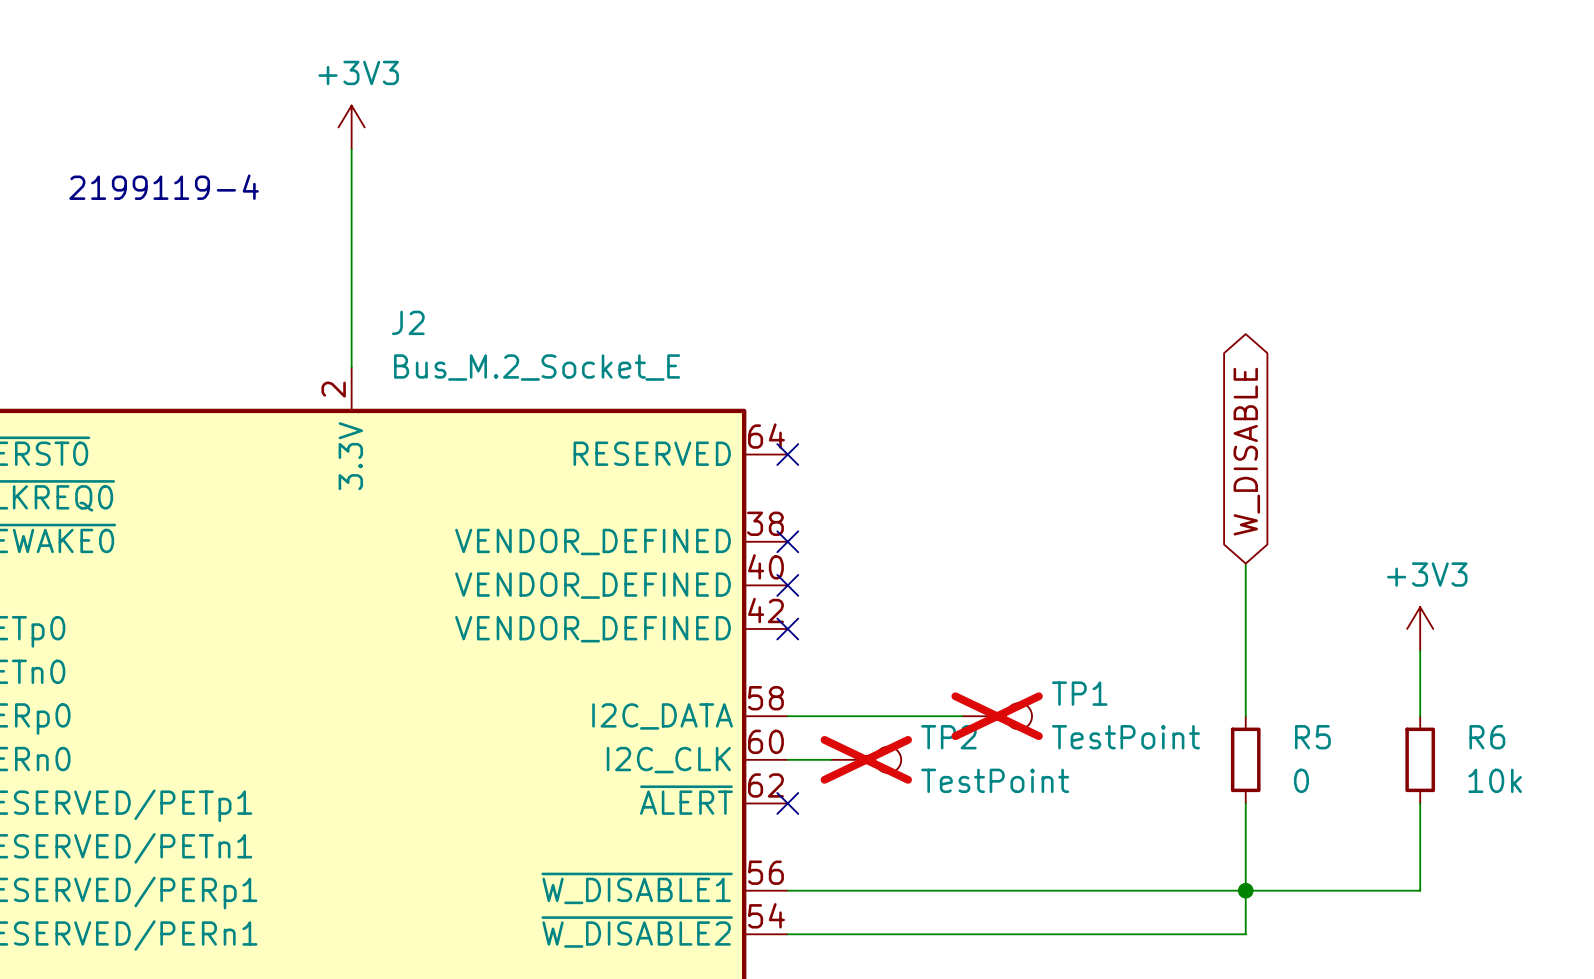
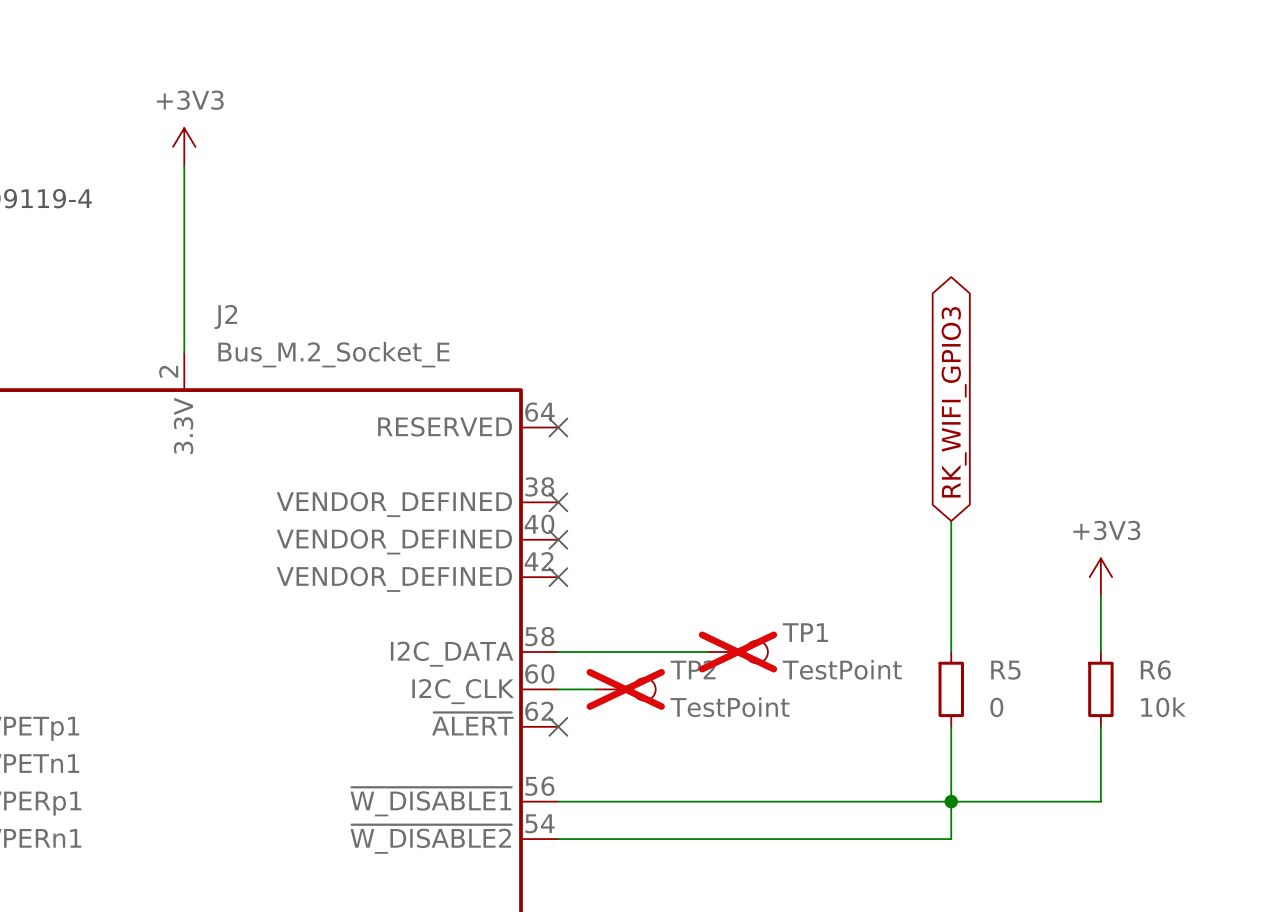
global label: W_DISABLE (1246, 451) -> RK_WIFI_GPIO3 (954, 402)

